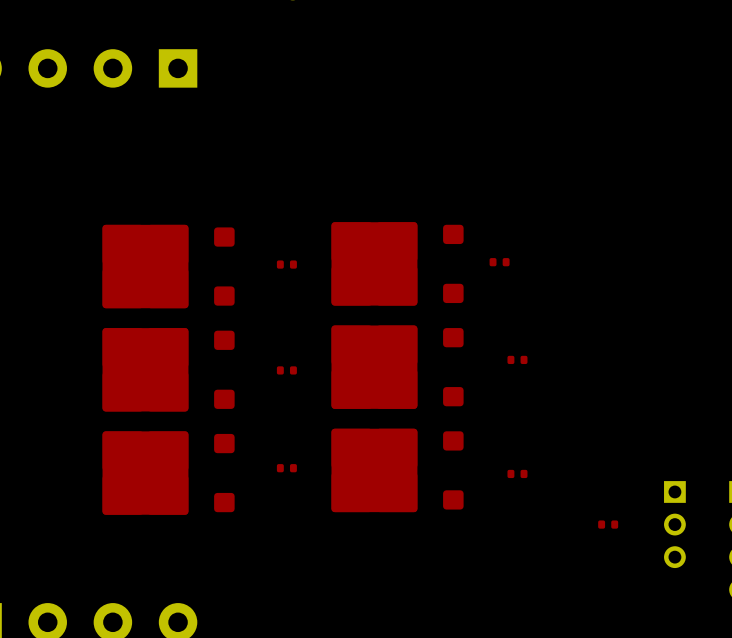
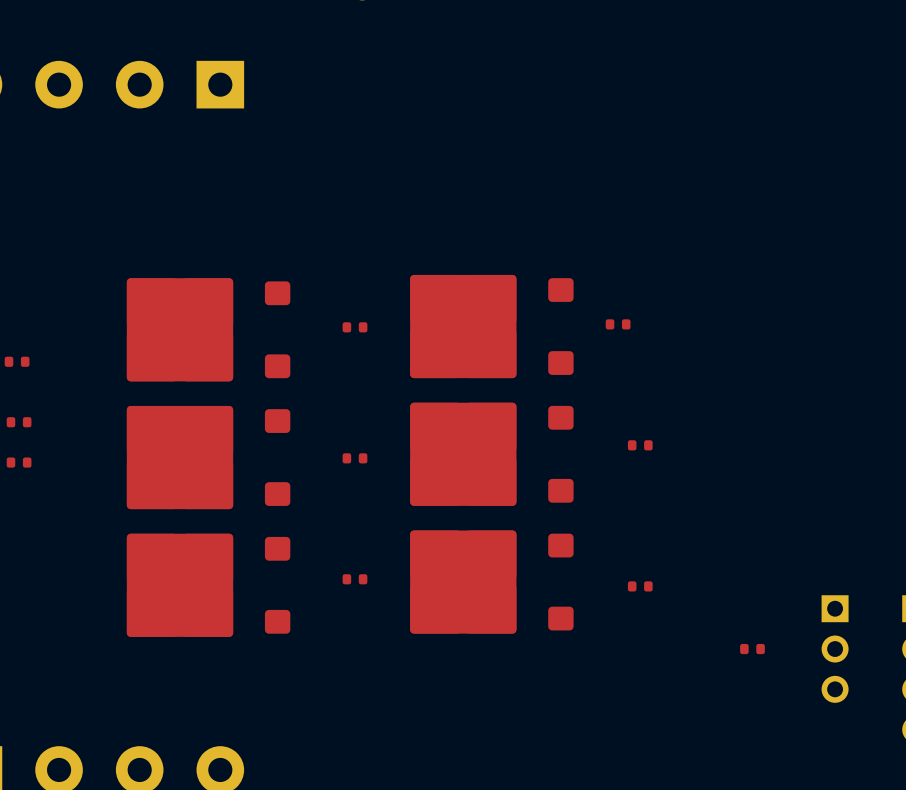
part: none -> (17, 361)
part: none -> (19, 422)
part: none -> (19, 462)

